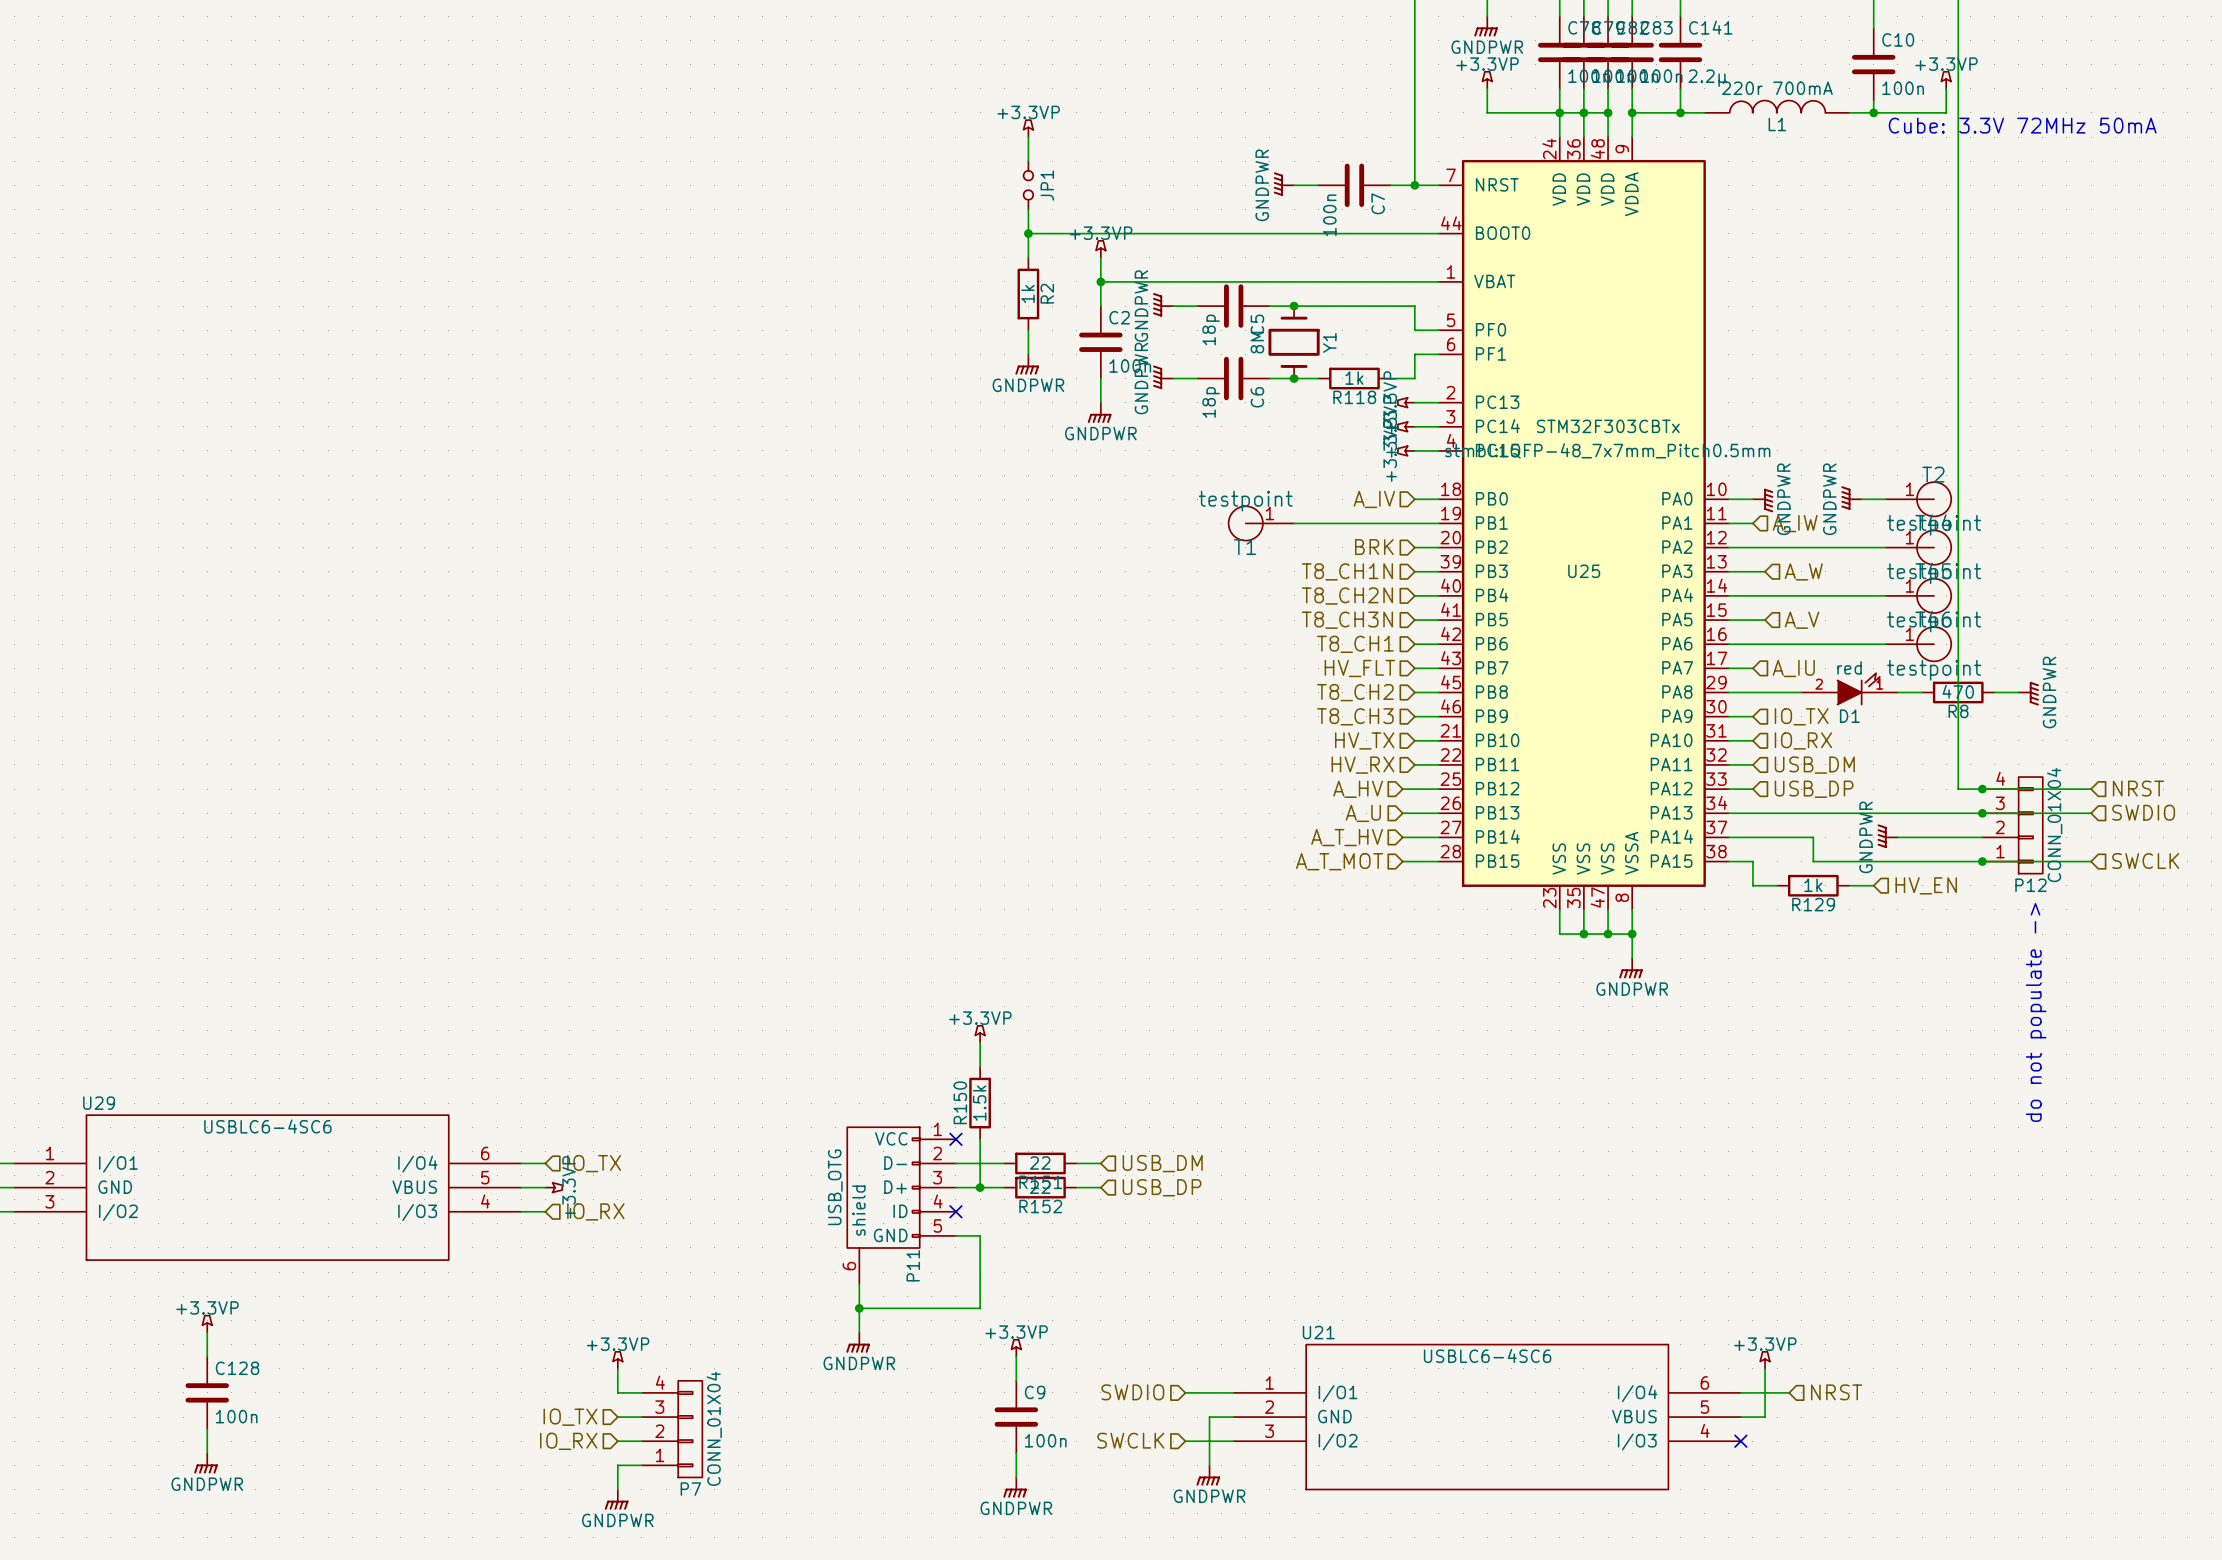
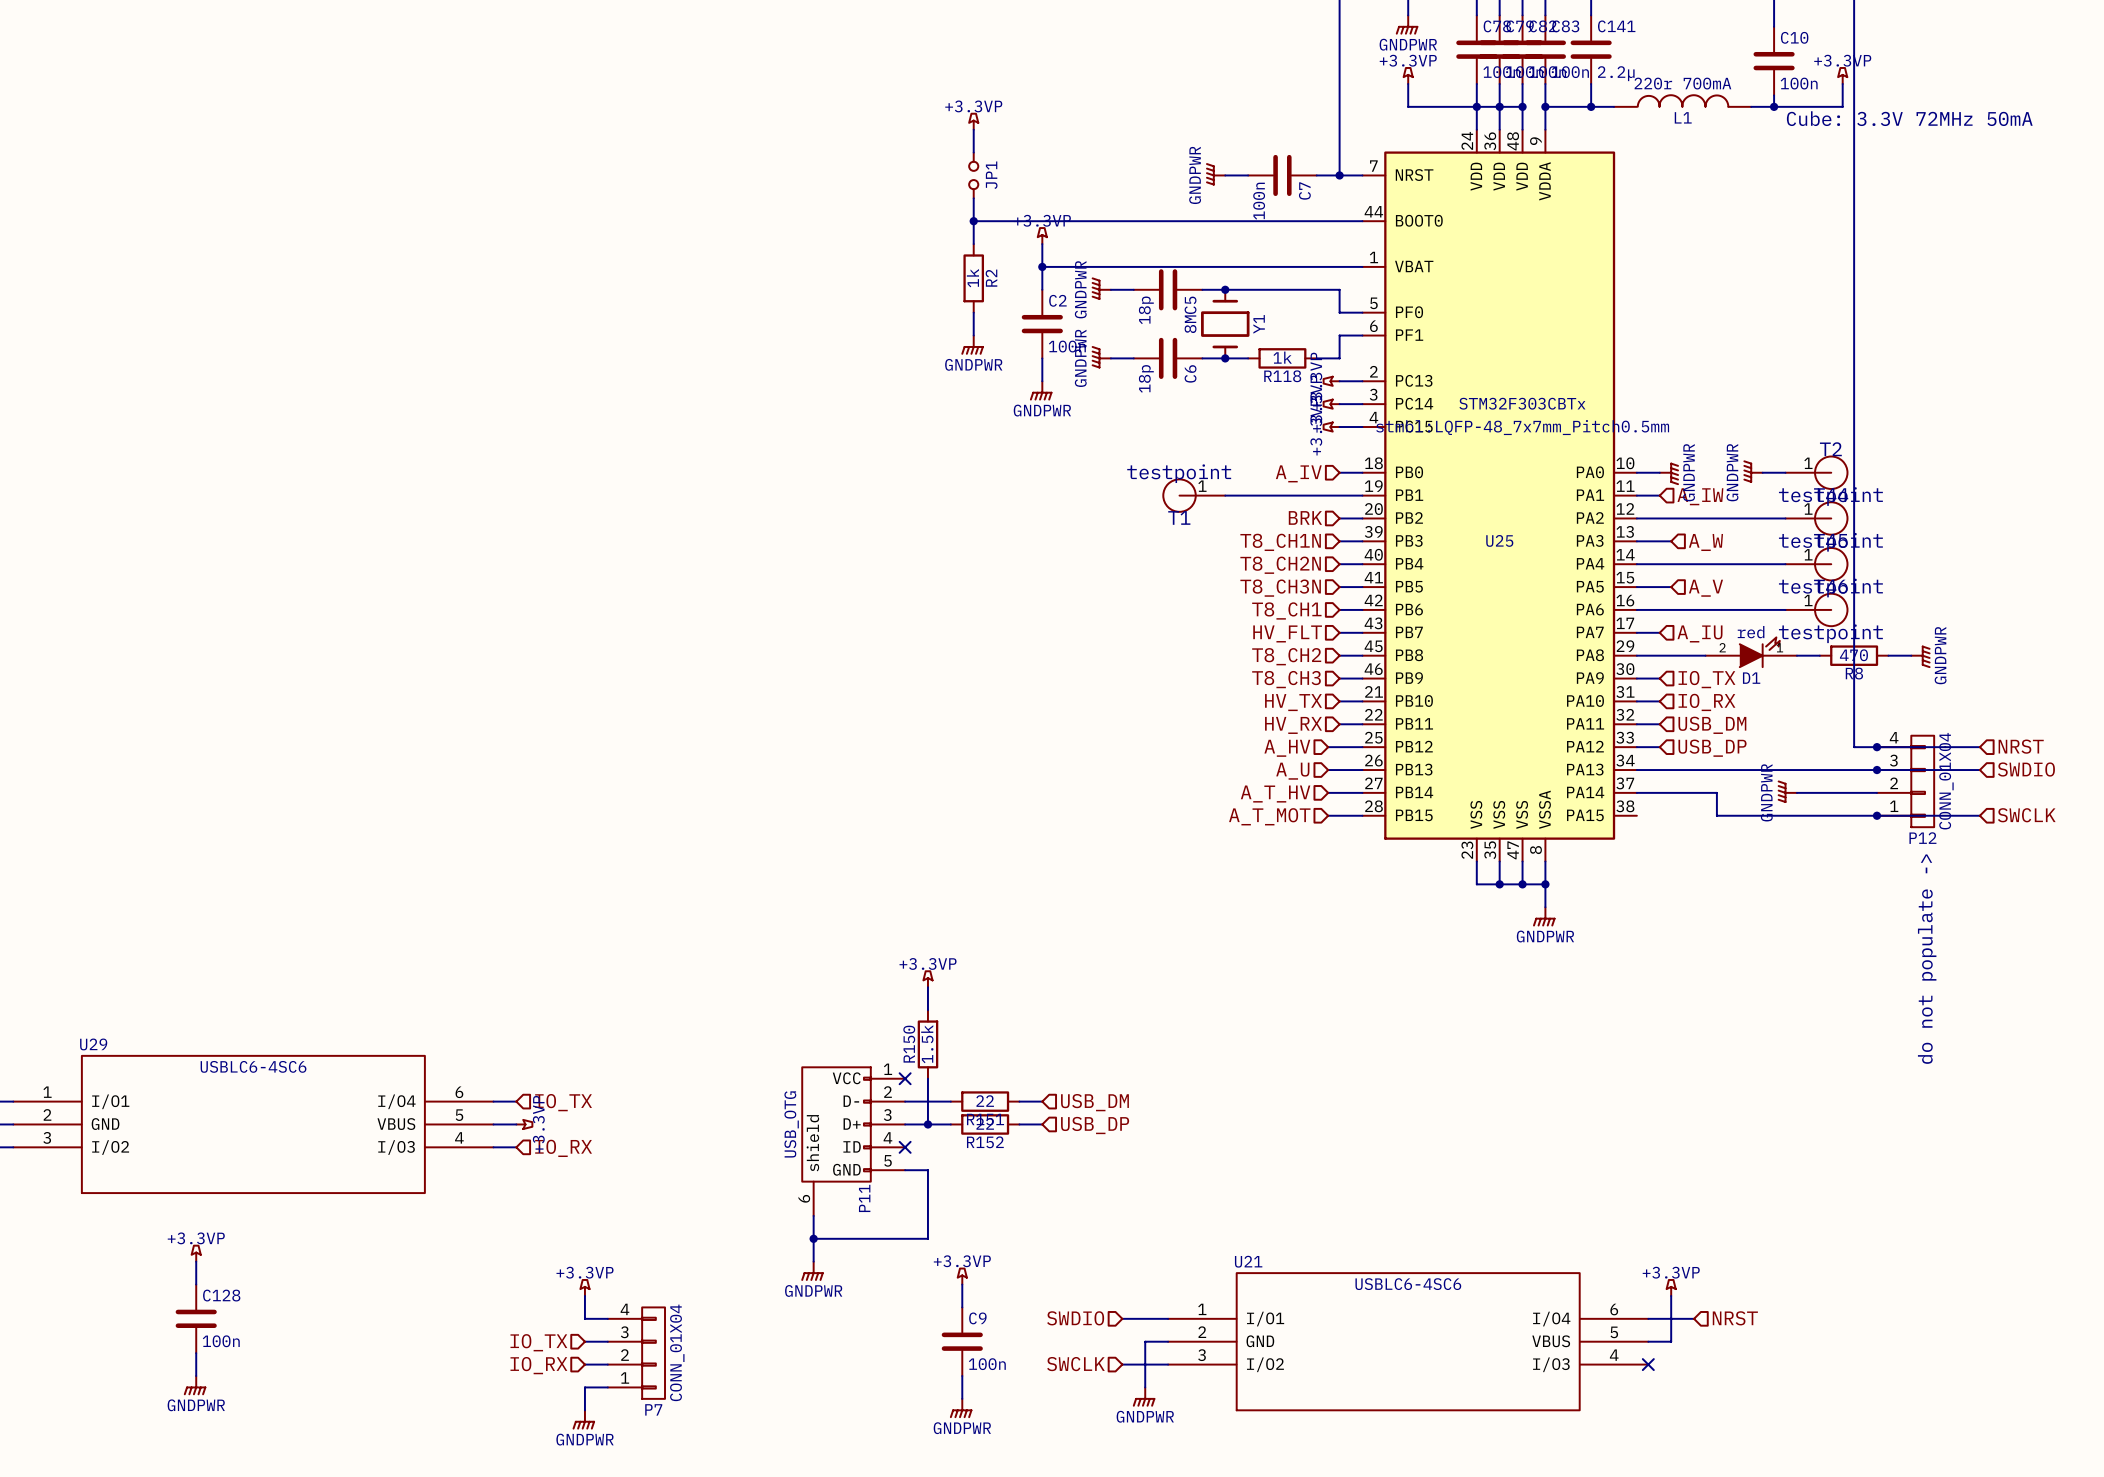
wire: (1728, 861) (1752, 861) (1752, 885) (1777, 885) -> none
R129: 1k (1813, 885) -> none
wire: (1849, 885) (1873, 885) -> none
hierarchical label: HV_EN (1926, 885) -> none

